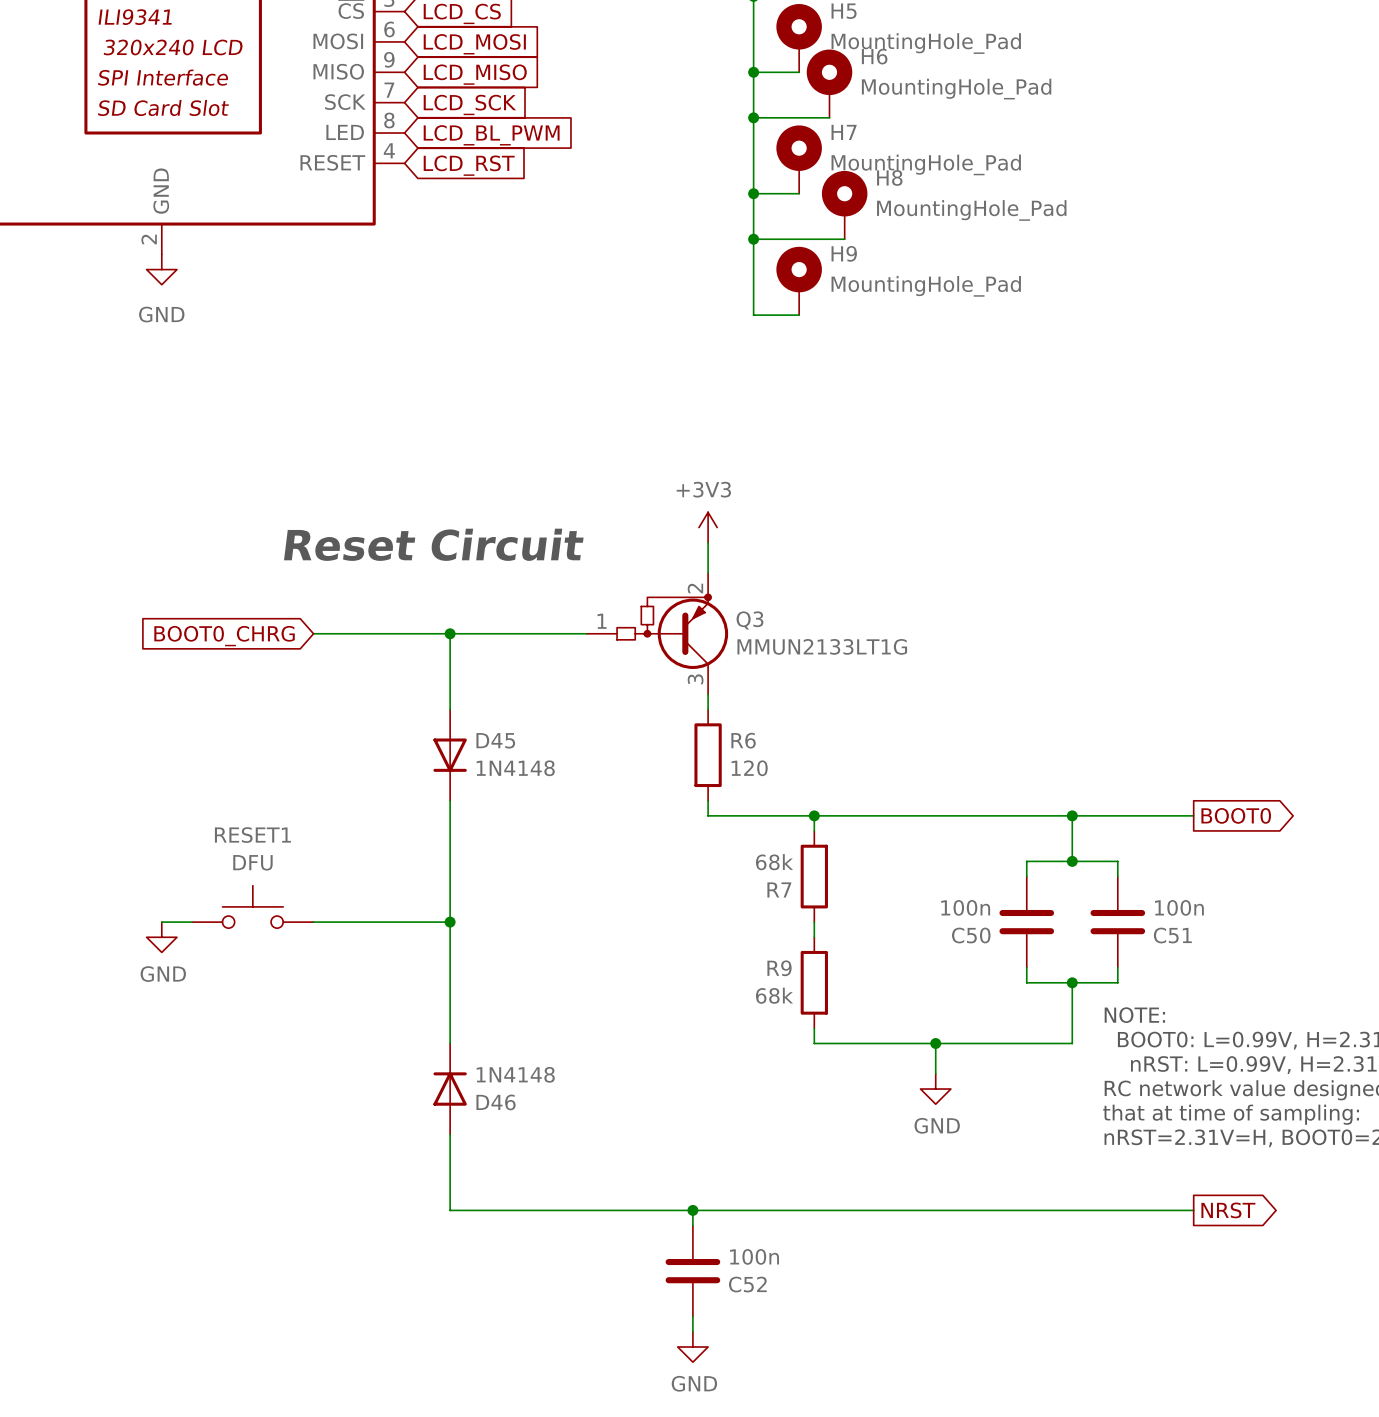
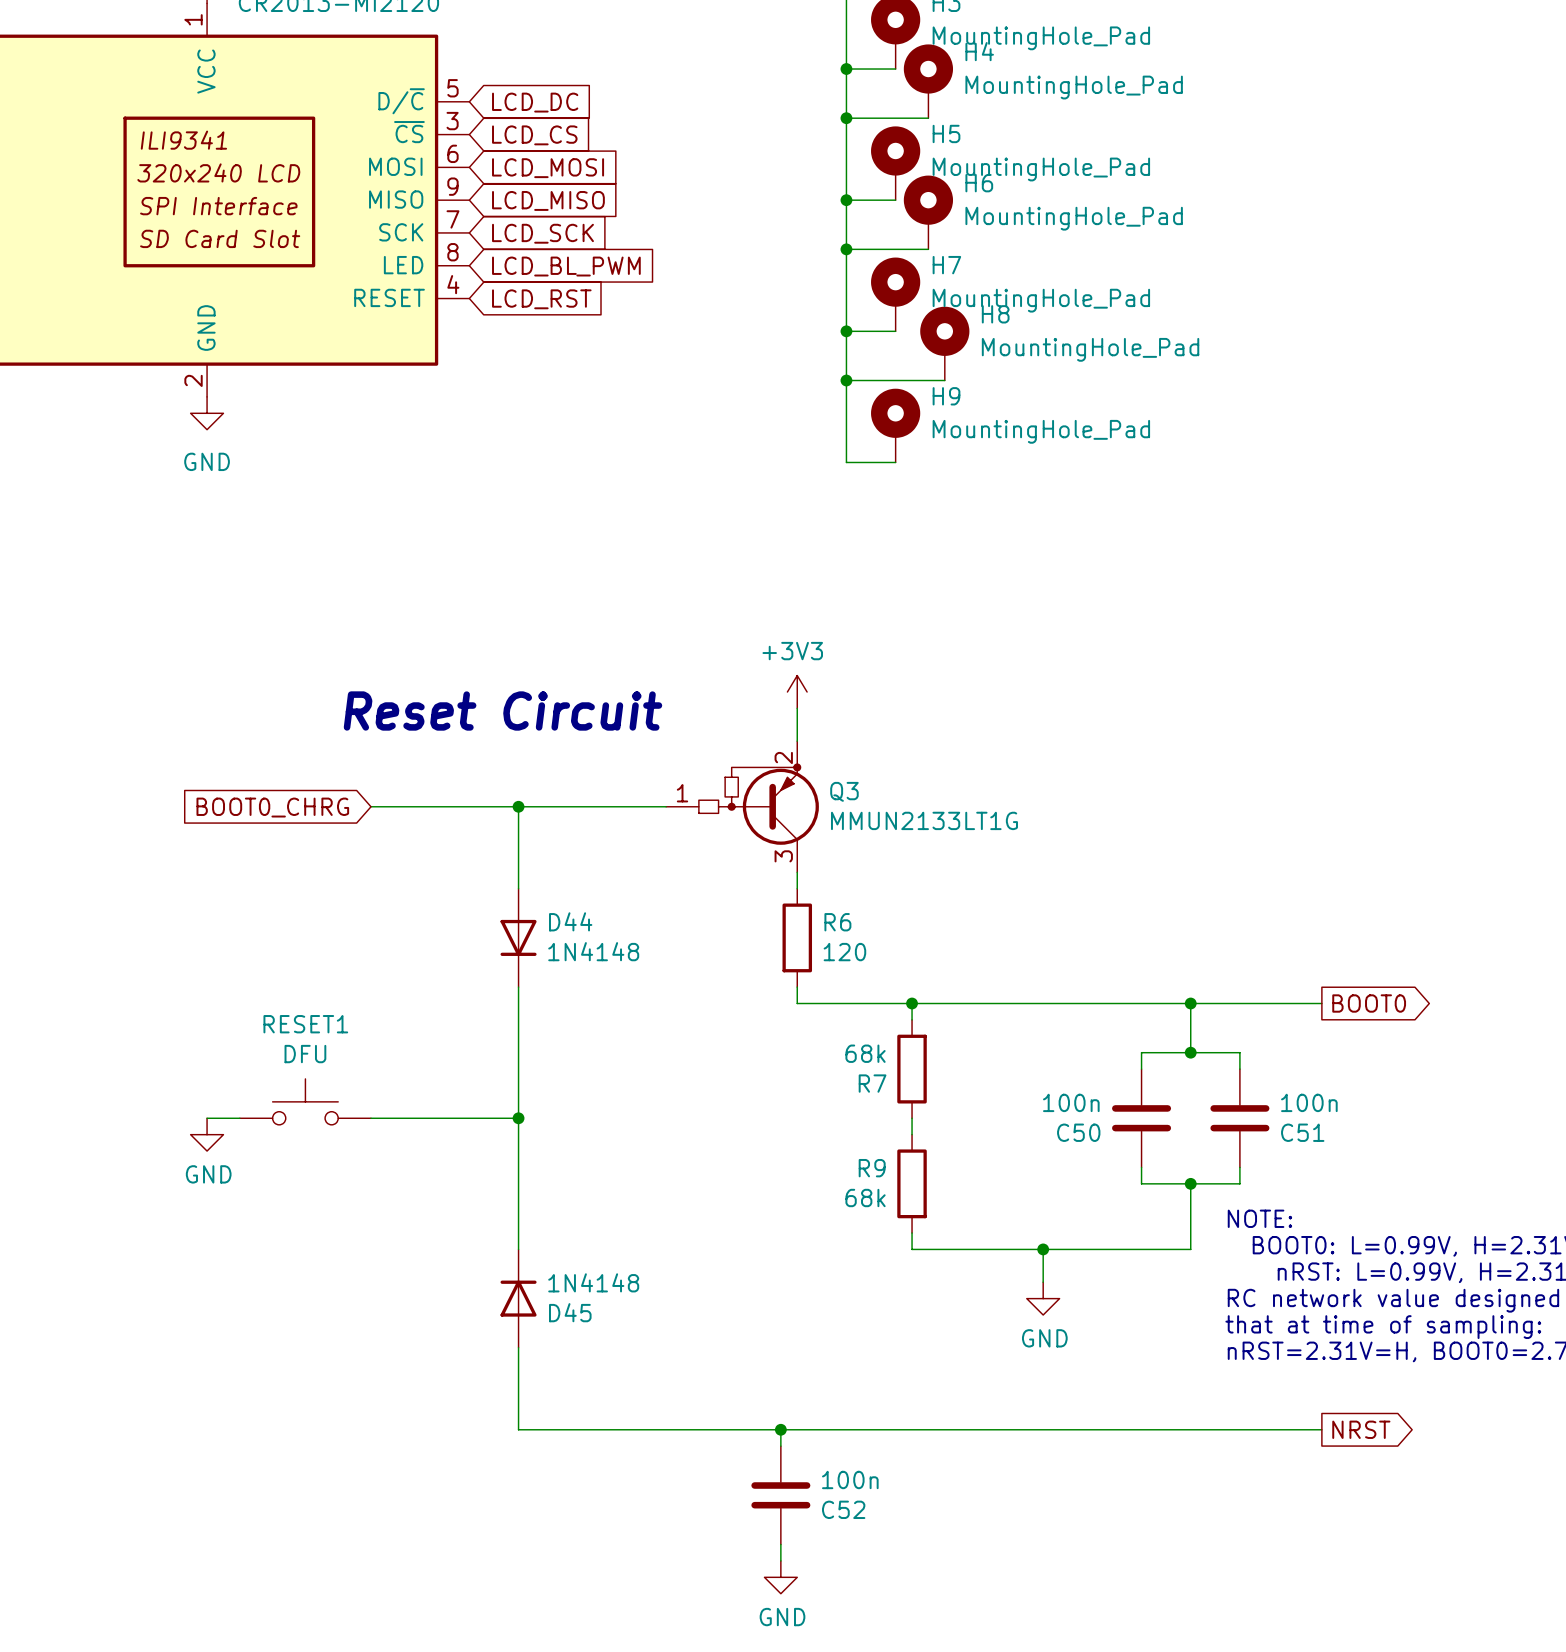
D45 name: D45 (495, 740) -> D44 (570, 921)
D46 name: D46 (496, 1102) -> D45 (570, 1312)

